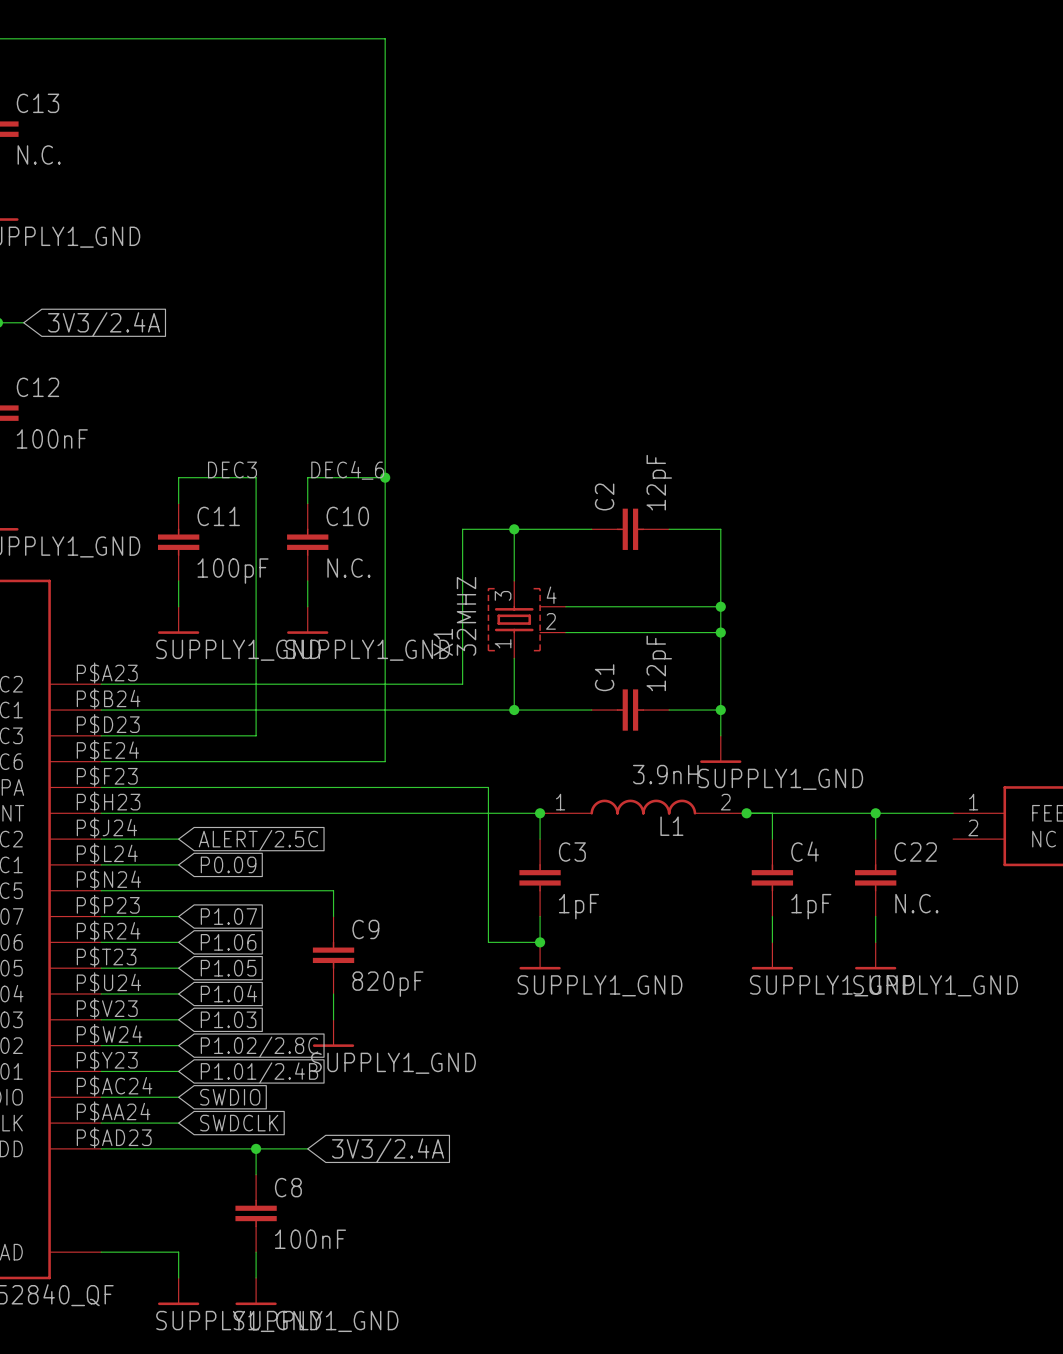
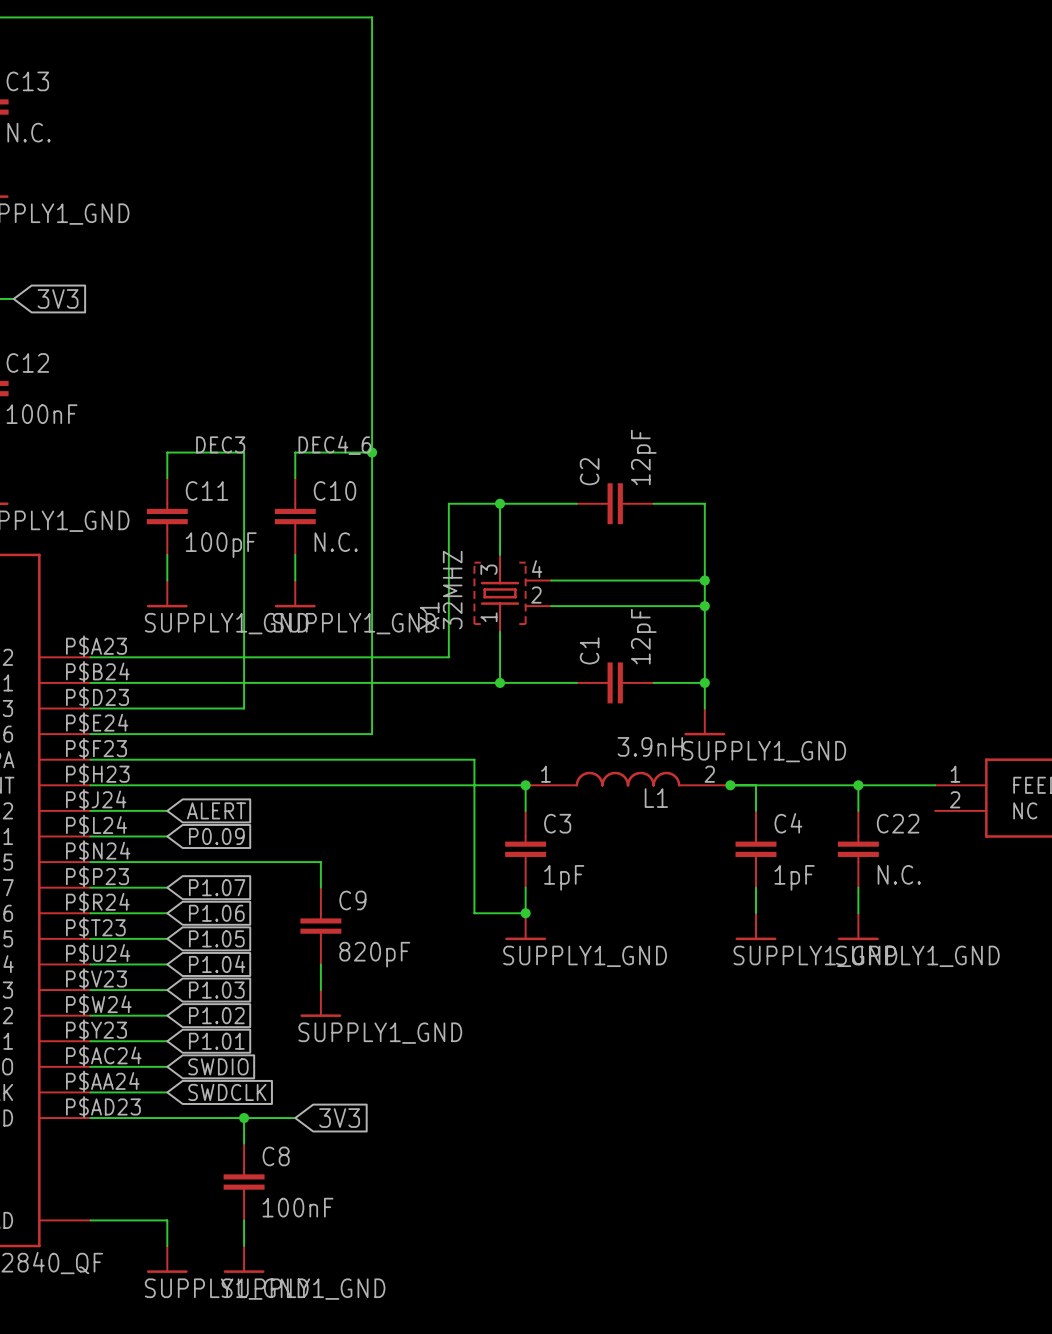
global label: 3V3/2.4A (104, 324) -> 3V3 (58, 298)
global label: ALERT/2.5C (258, 840) -> ALERT (216, 810)
global label: P1.02/2.8C (259, 1047) -> P1.02 (216, 1015)
global label: P1.01/2.4B (259, 1072) -> P1.01 (216, 1041)
global label: 3V3/2.4A (388, 1150) -> 3V3 (339, 1118)

